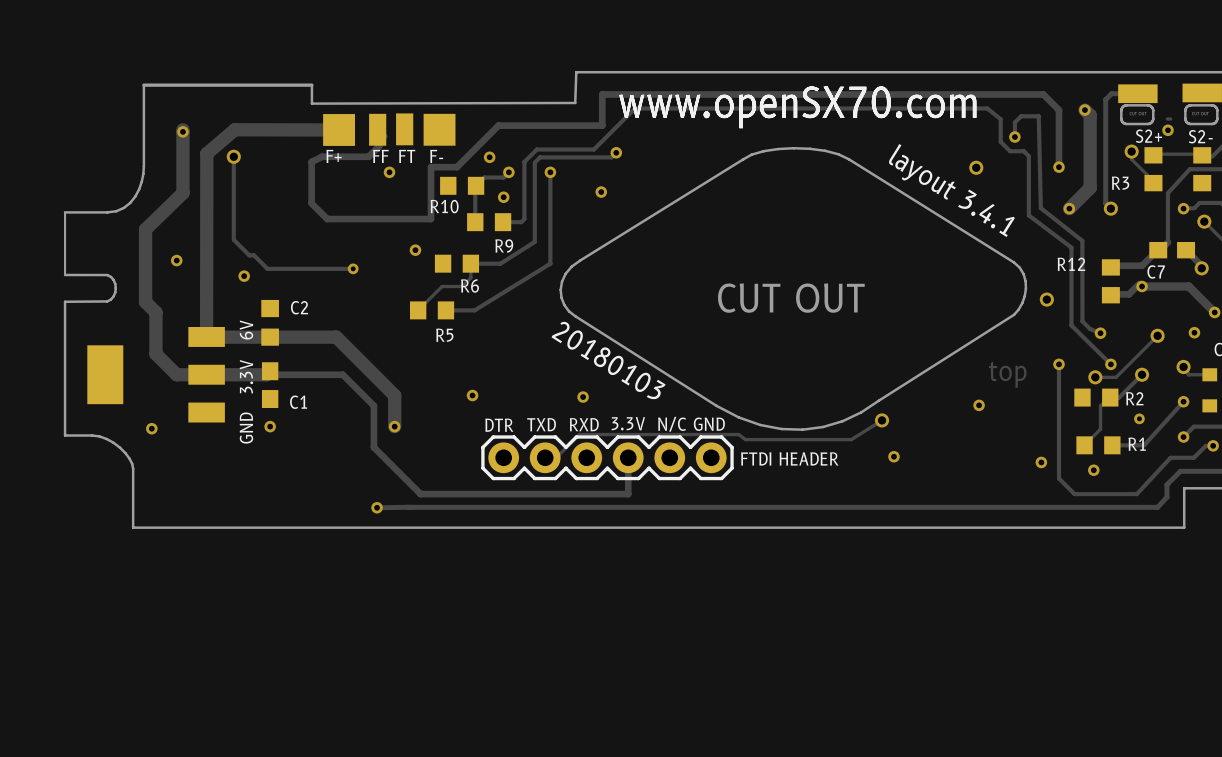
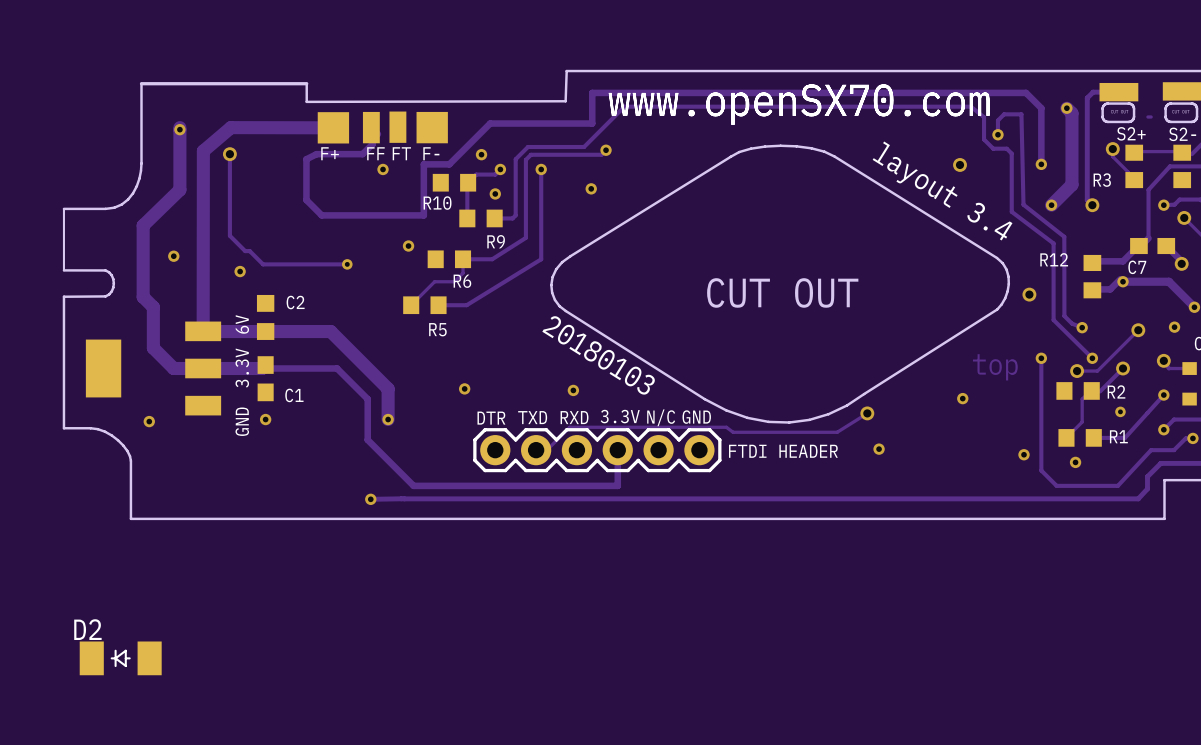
via: (1167, 130) -> none
text: layout 3.4.1 (951, 190) -> layout 3.4 (942, 190)
D2: none -> (120, 658)

